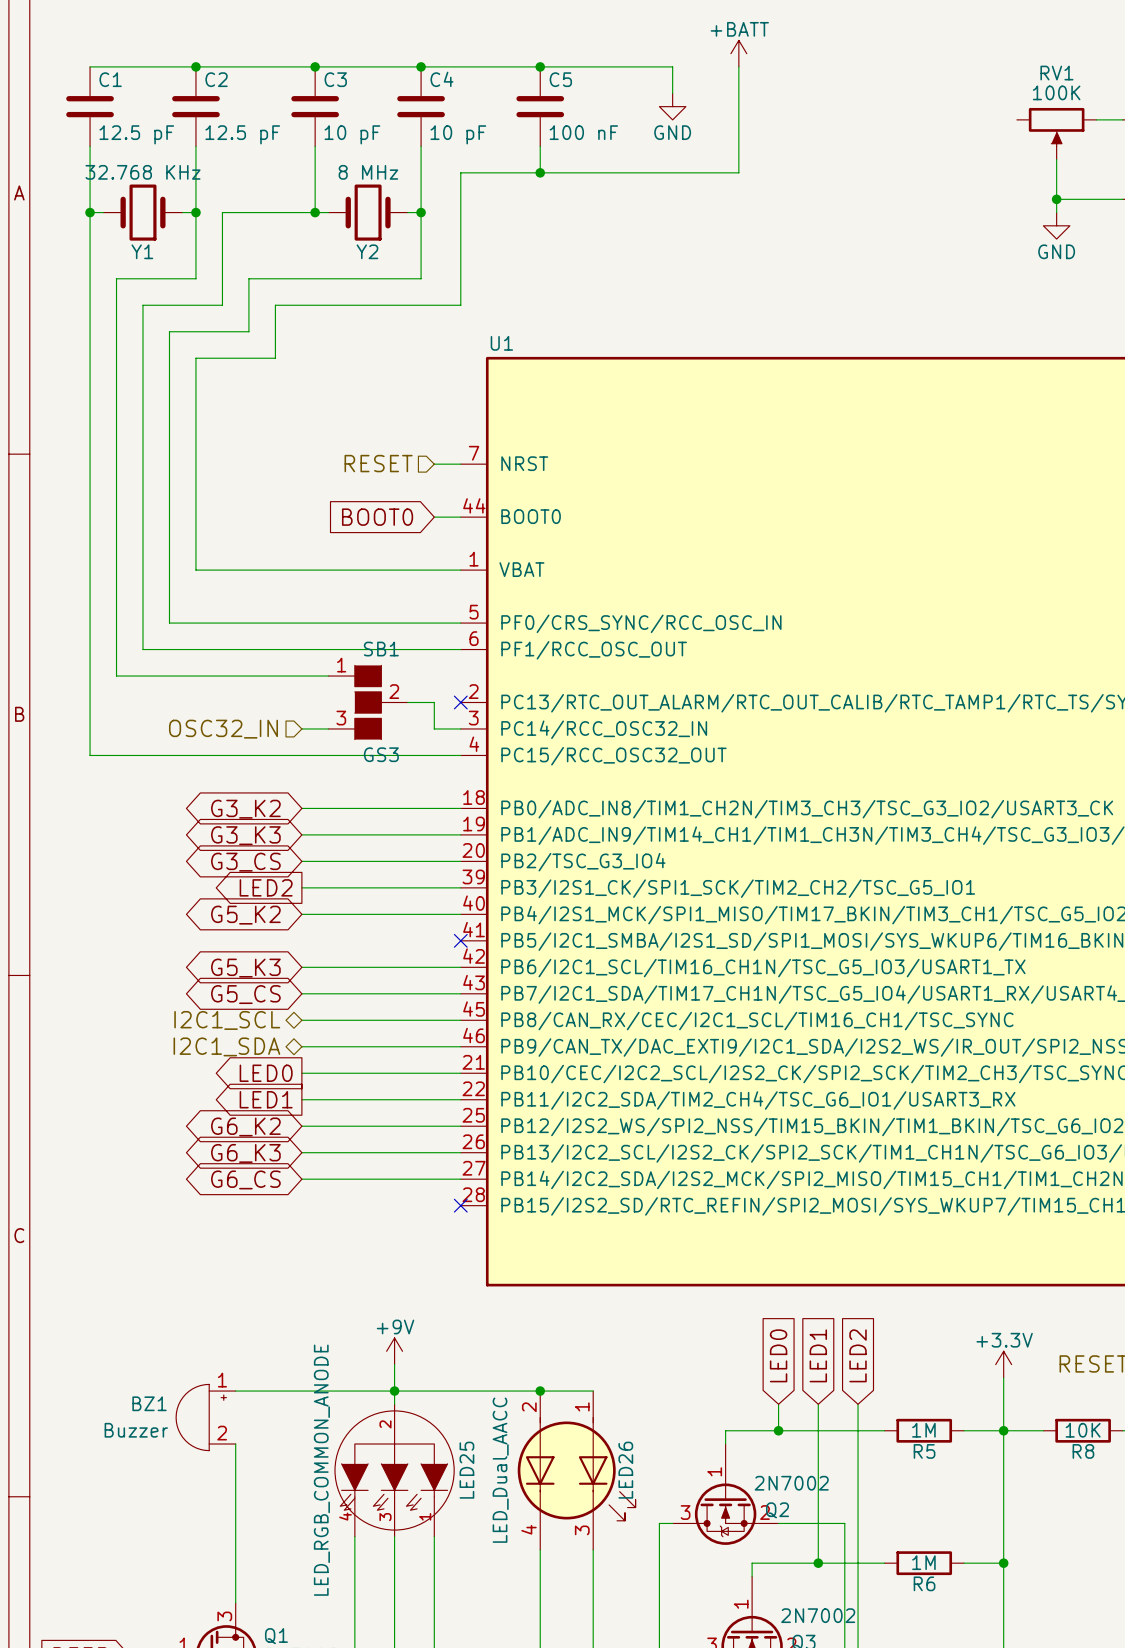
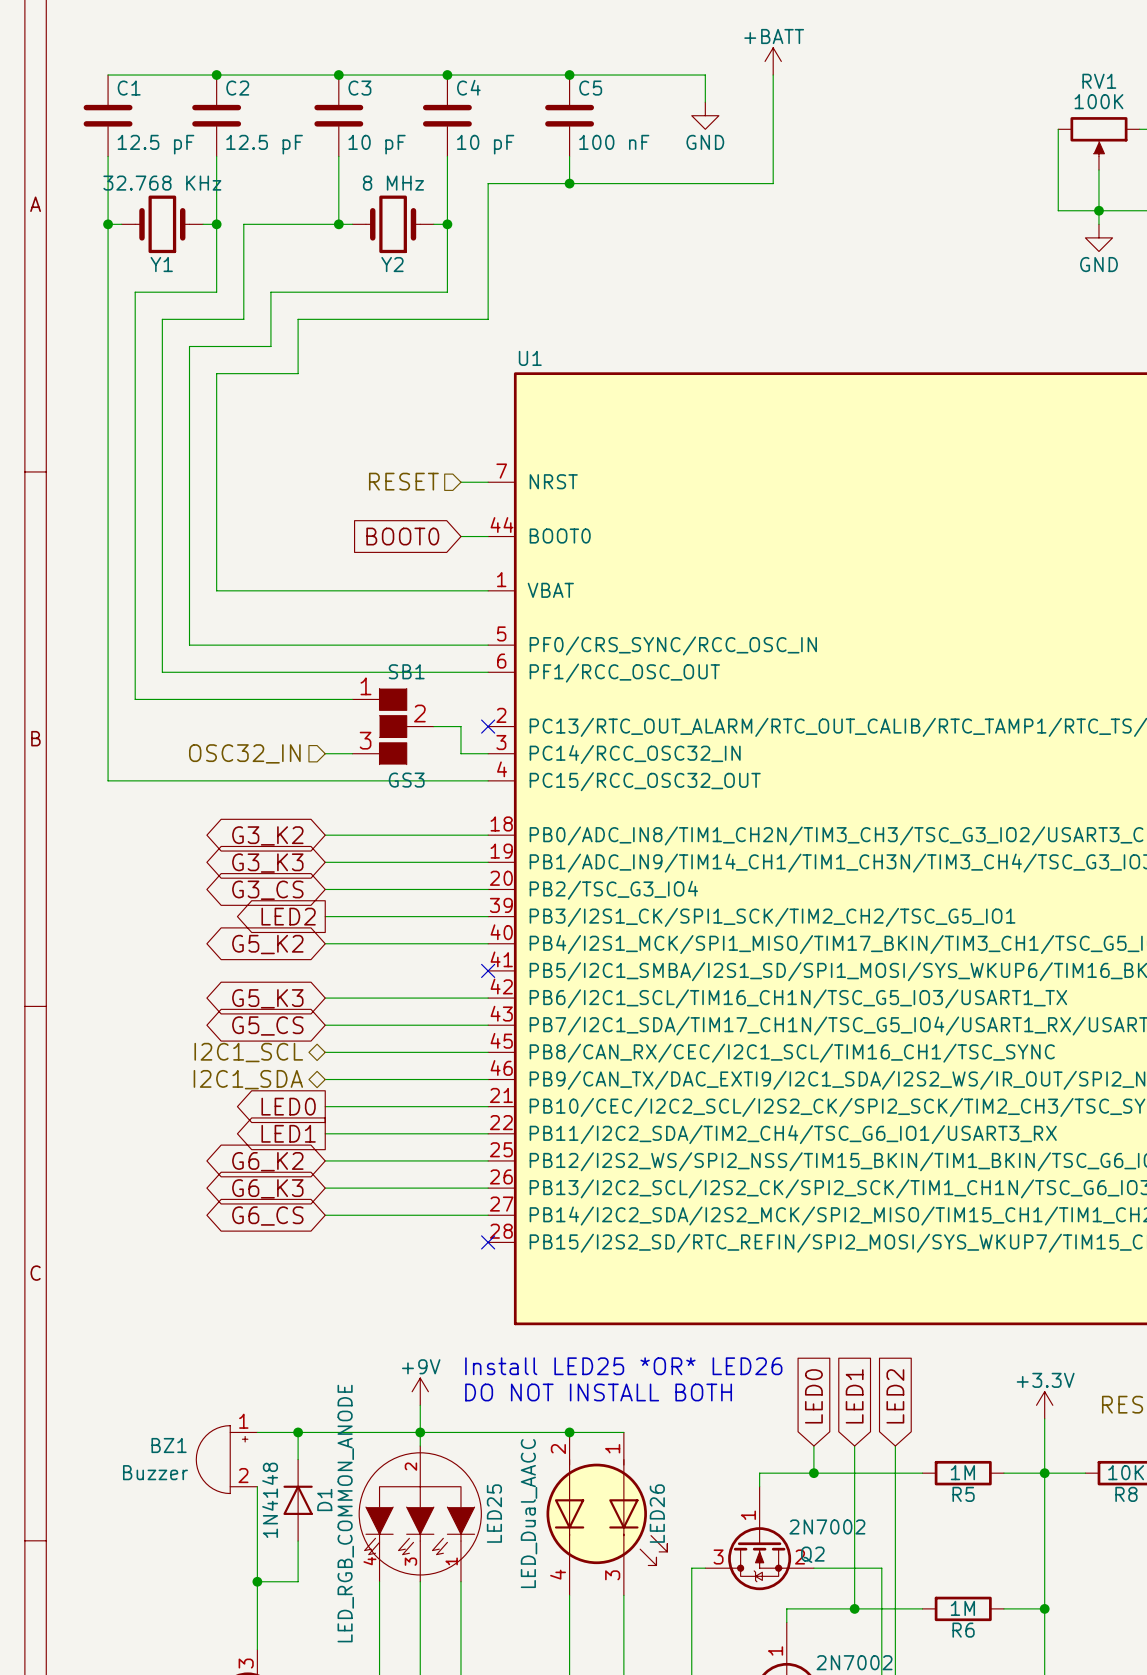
wire: none -> (1058, 129) (1058, 210) (1098, 210)
SB1 symbol: [328, 665, 408, 740] -> [352, 688, 434, 765]
text: none -> Install LED25 *OR* LED26 (623, 1366)
text: none -> DO NOT INSTALL BOTH (598, 1392)
wire: none -> (298, 1432) (298, 1459)
junction: none -> (298, 1432)
D1: none -> 1N4148 (298, 1500)
wire: none -> (298, 1541) (298, 1581) (257, 1581)
junction: none -> (257, 1581)

